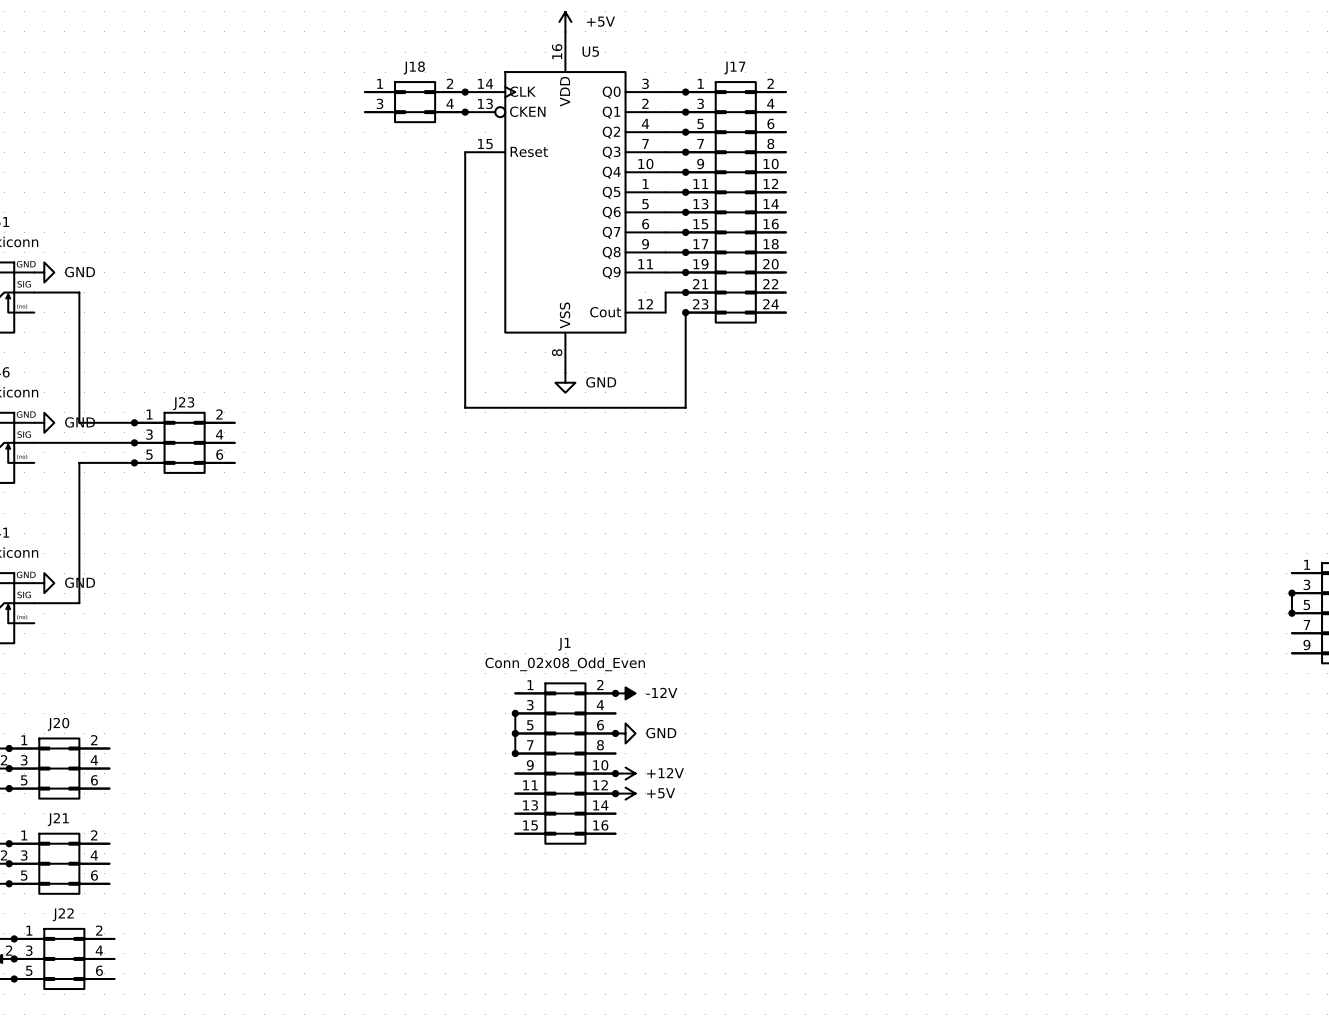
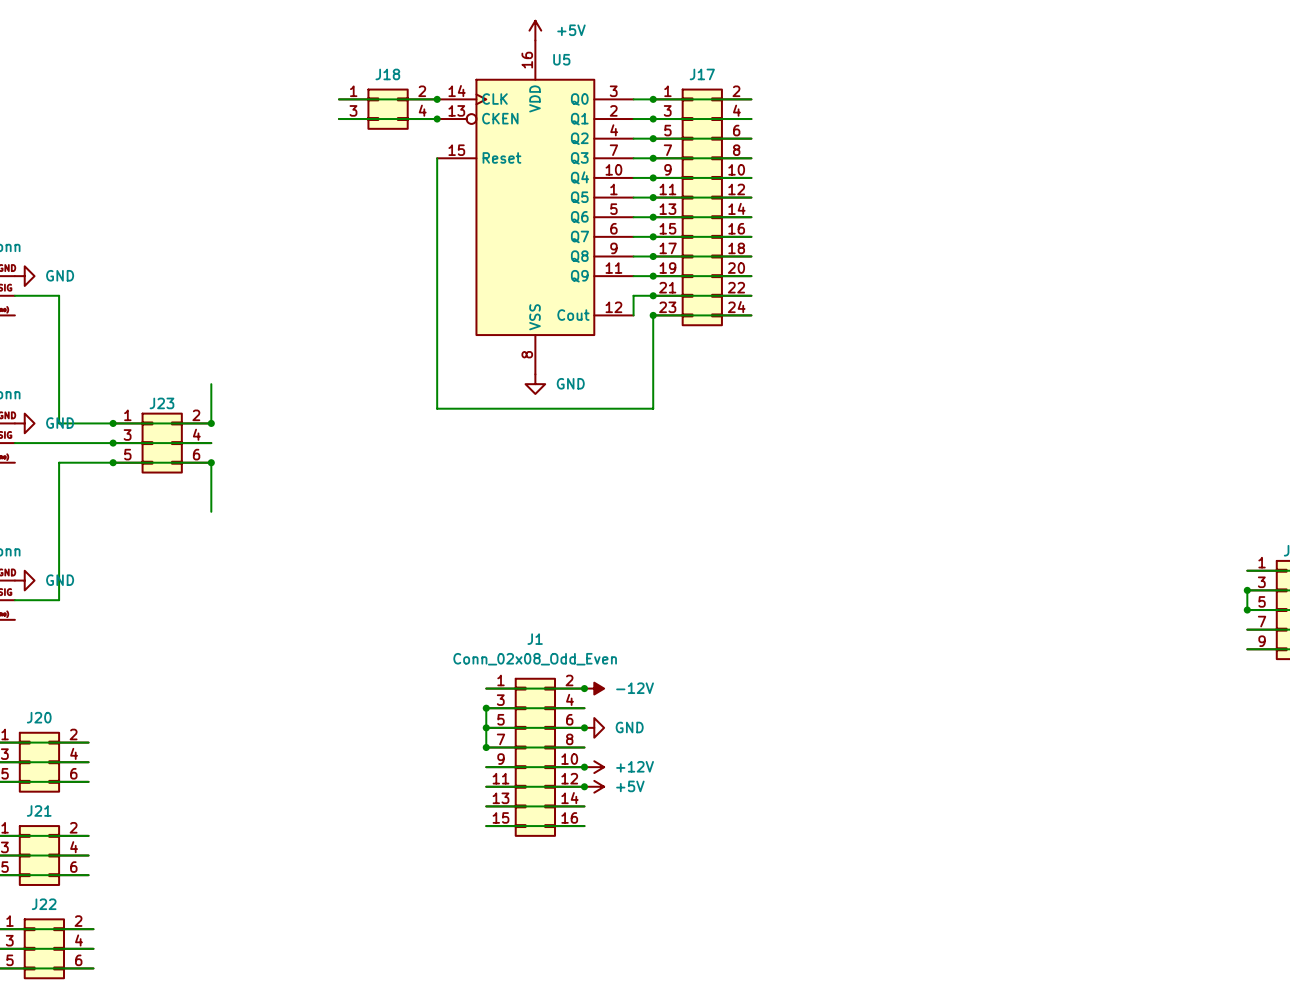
wire: none -> (211, 384) (211, 423)
junction: none -> (211, 423)
wire: none -> (211, 462) (211, 511)
junction: none -> (211, 462)

